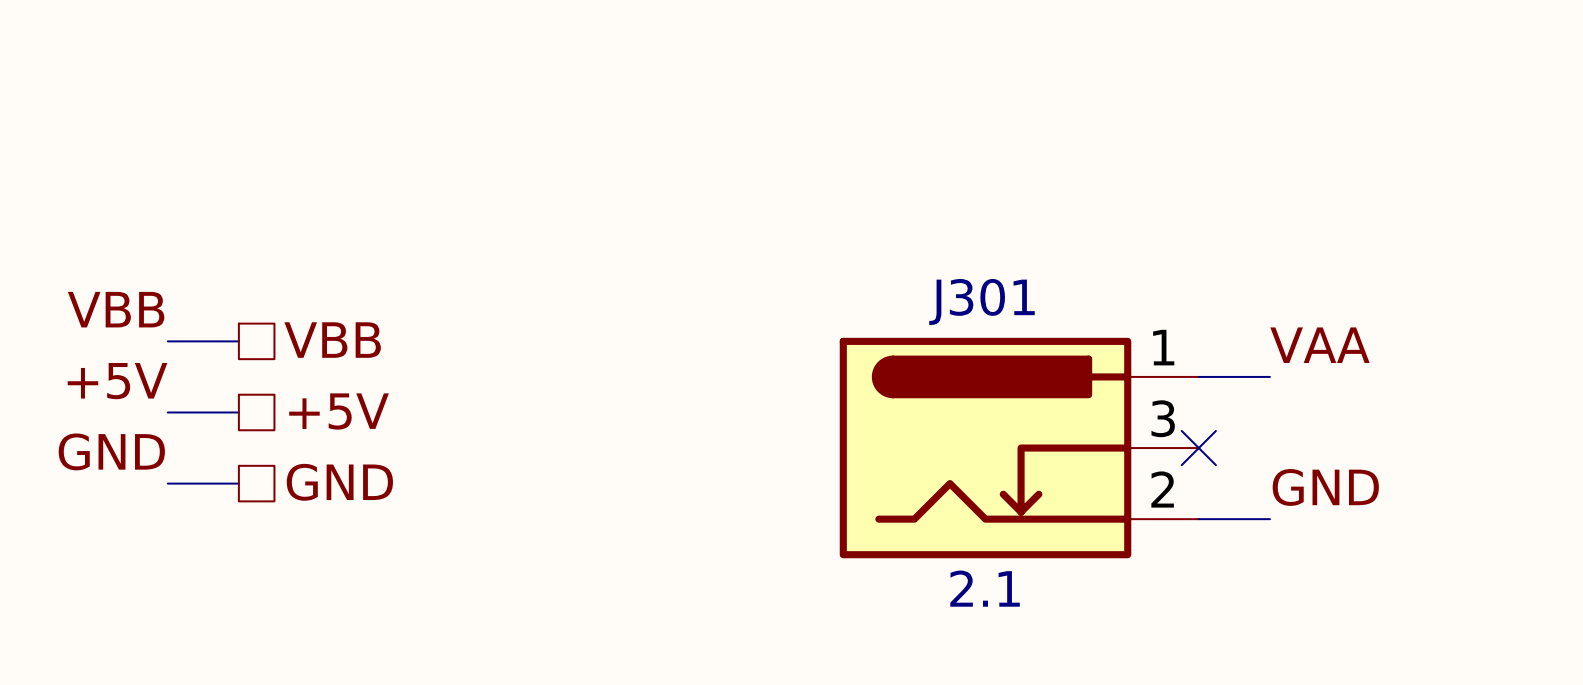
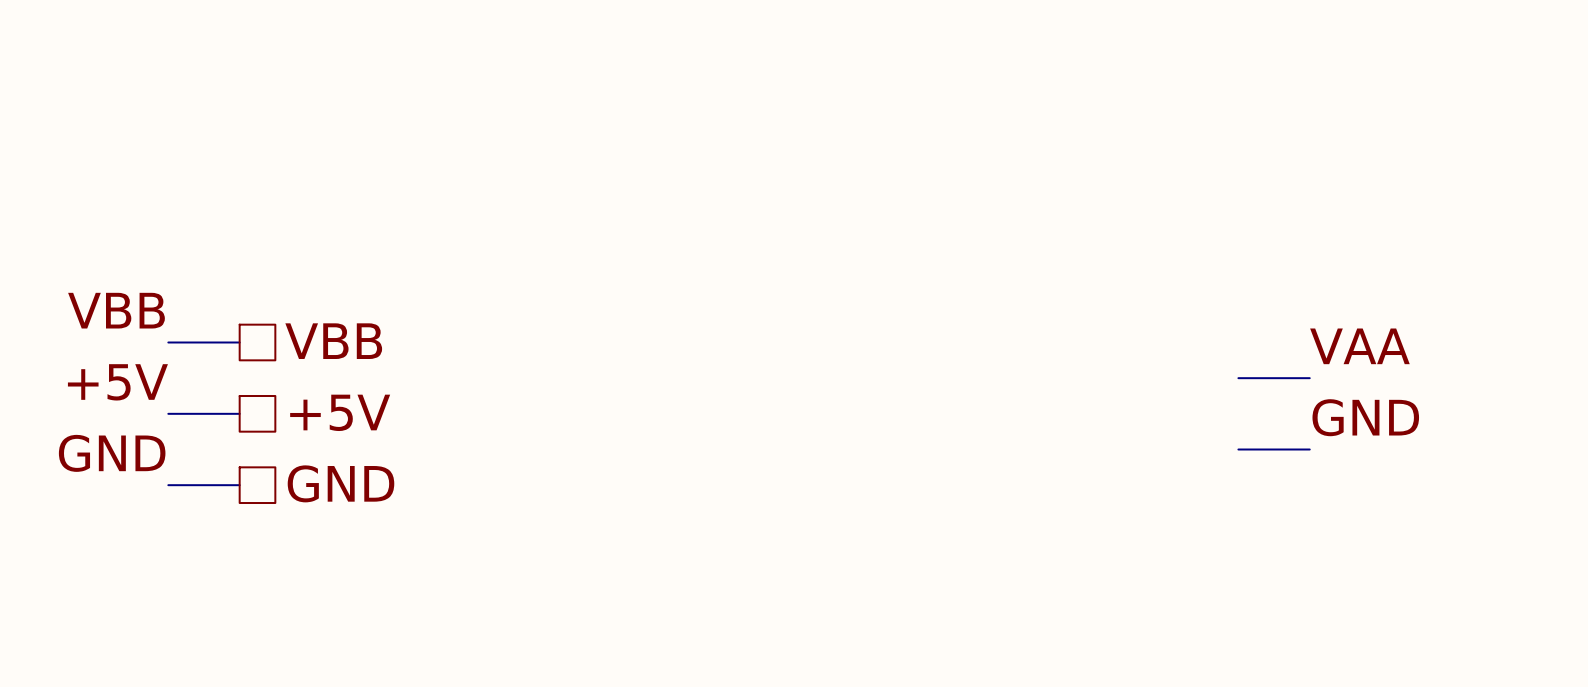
label position: VAA (1319, 345) -> VAA (1359, 346)
wire: (1198, 376) (1234, 376) -> (1274, 378) (1309, 378)
J301: 2.1 (1019, 448) -> none
no-connect mark: (1198, 448) -> none
label position: GND (1325, 487) -> GND (1365, 417)
wire: (1198, 519) (1269, 519) -> (1238, 449) (1309, 449)

